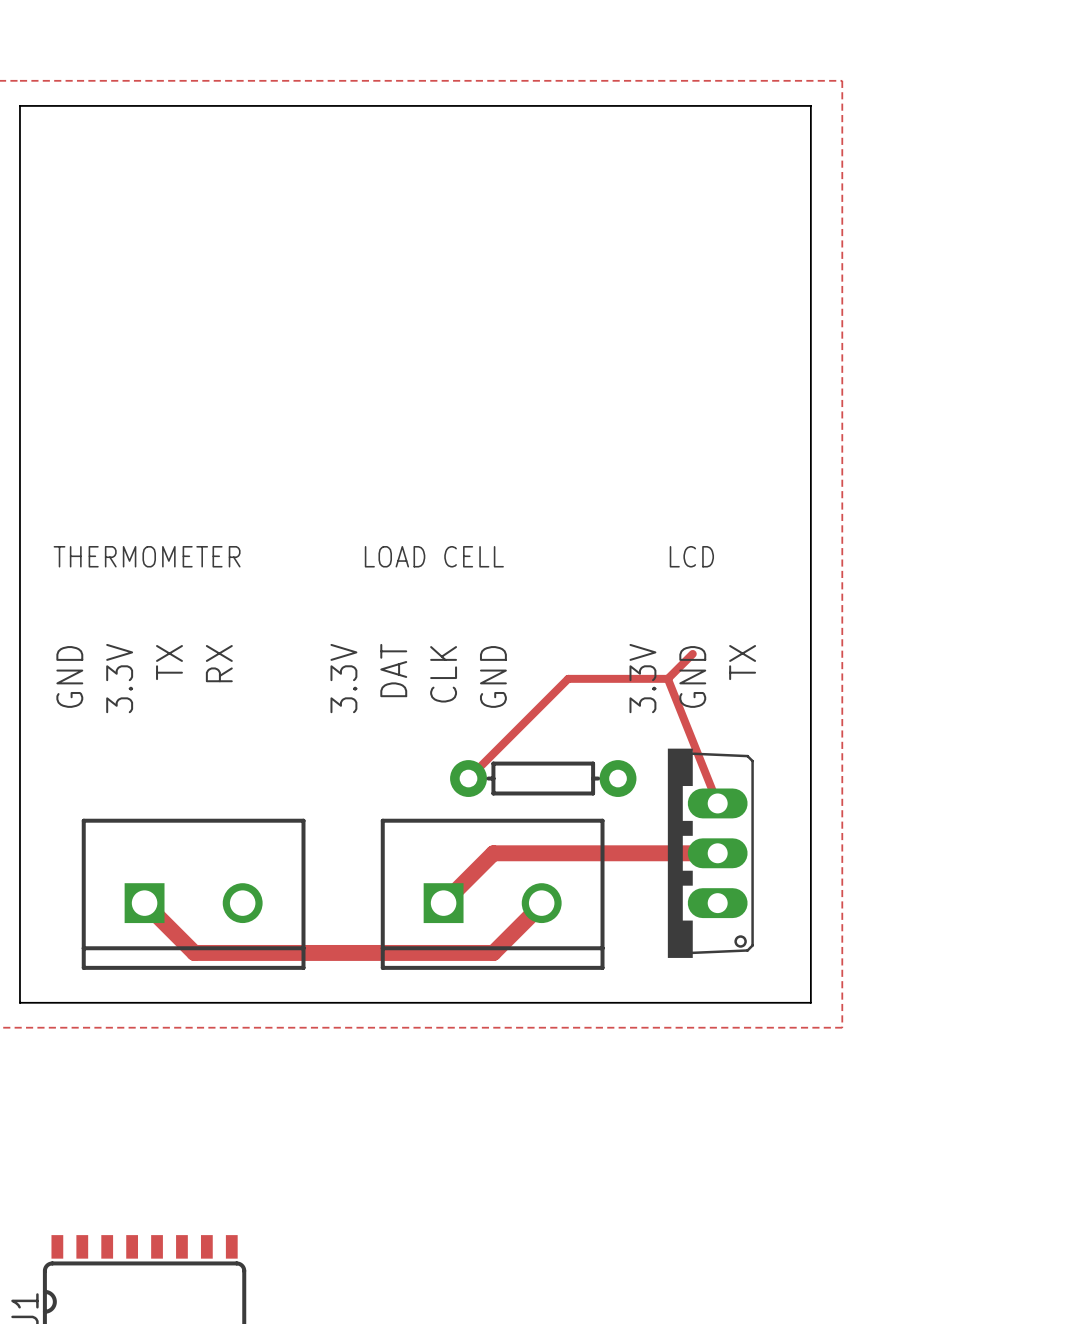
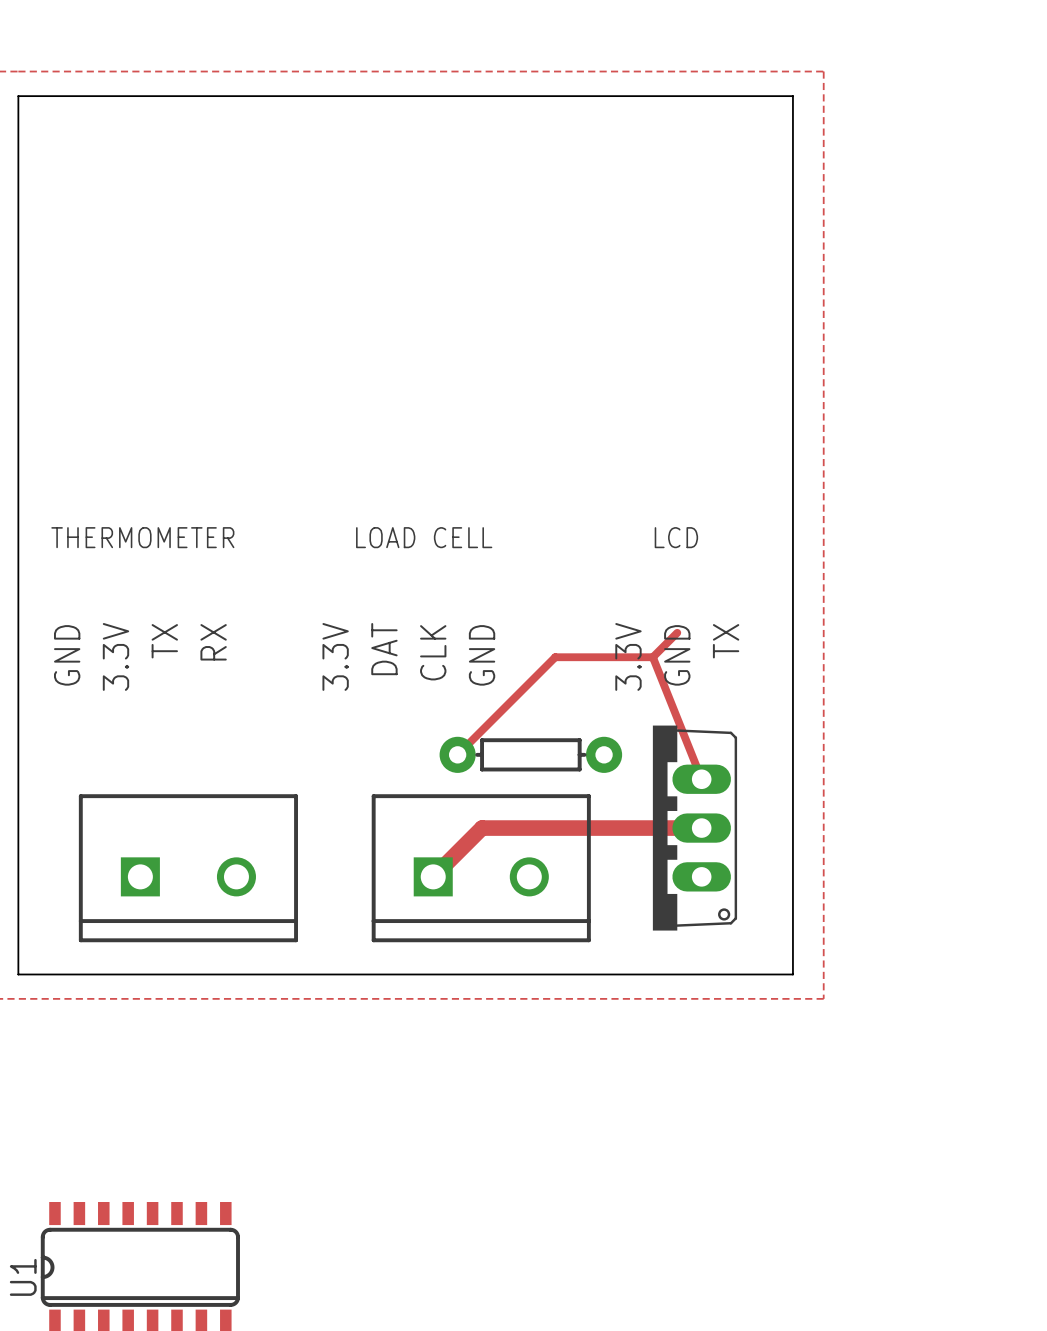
track: (144, 903) (194, 952) (493, 952) (541, 903) -> none

